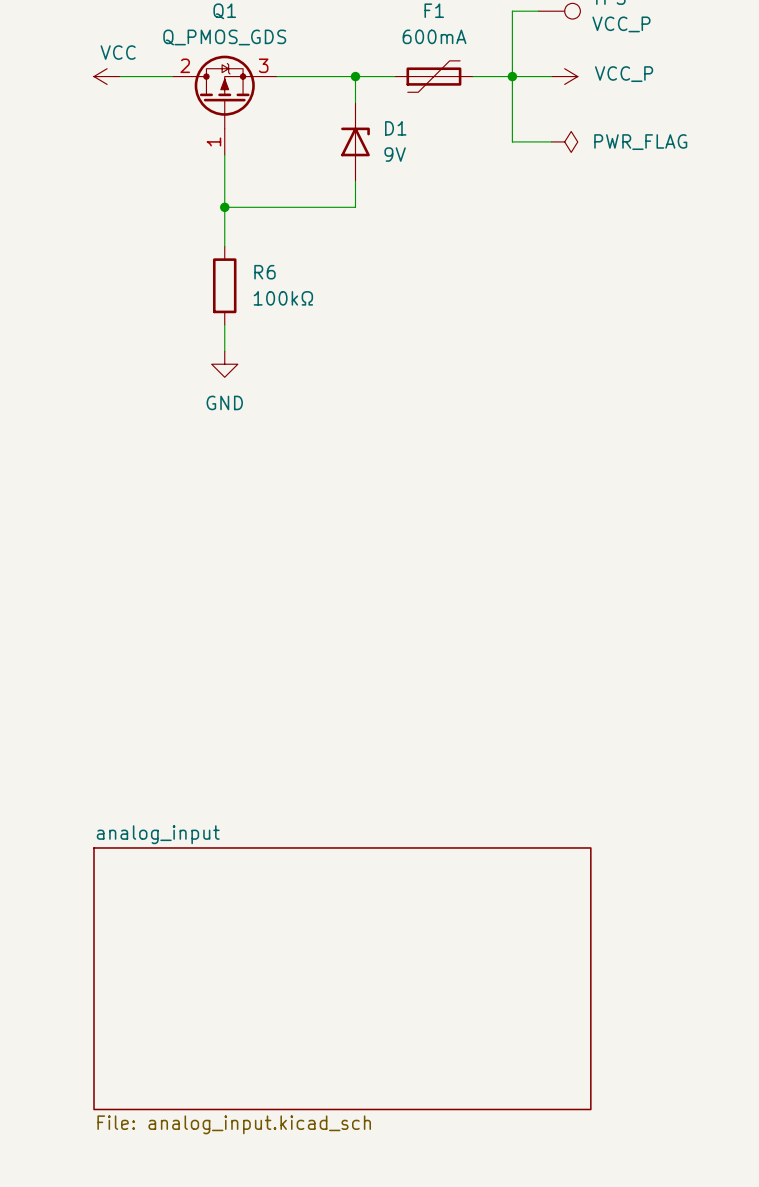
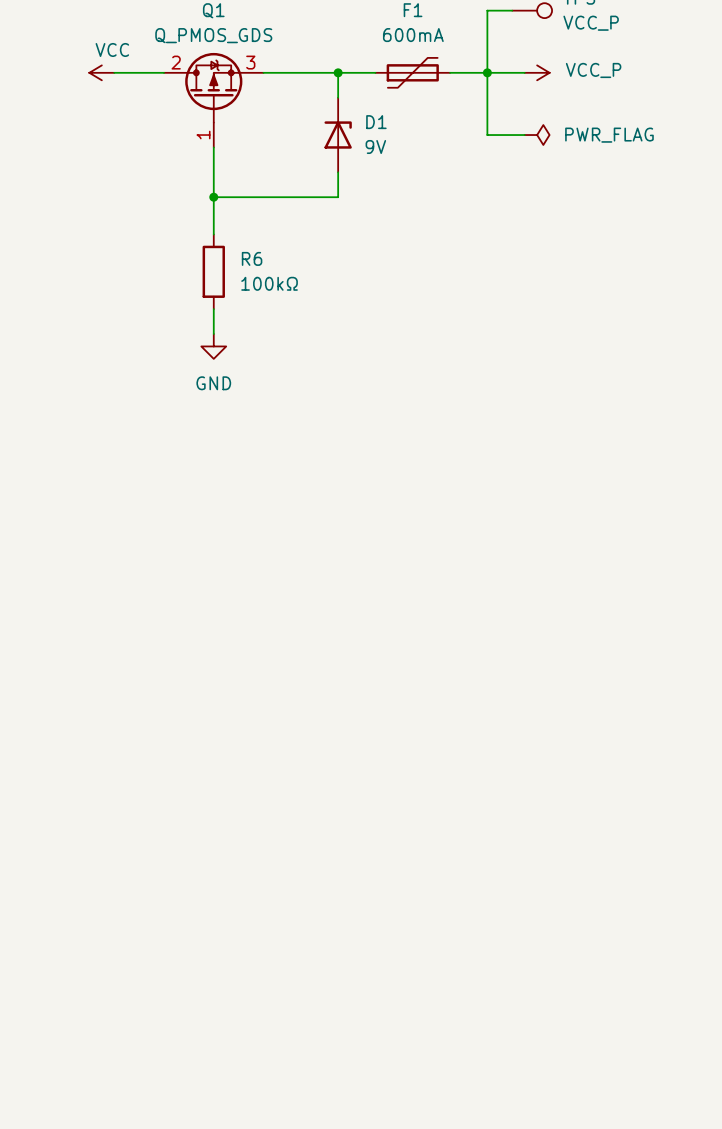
sheet analog_input: File: analog_input.kicad_sch (342, 978) -> none

